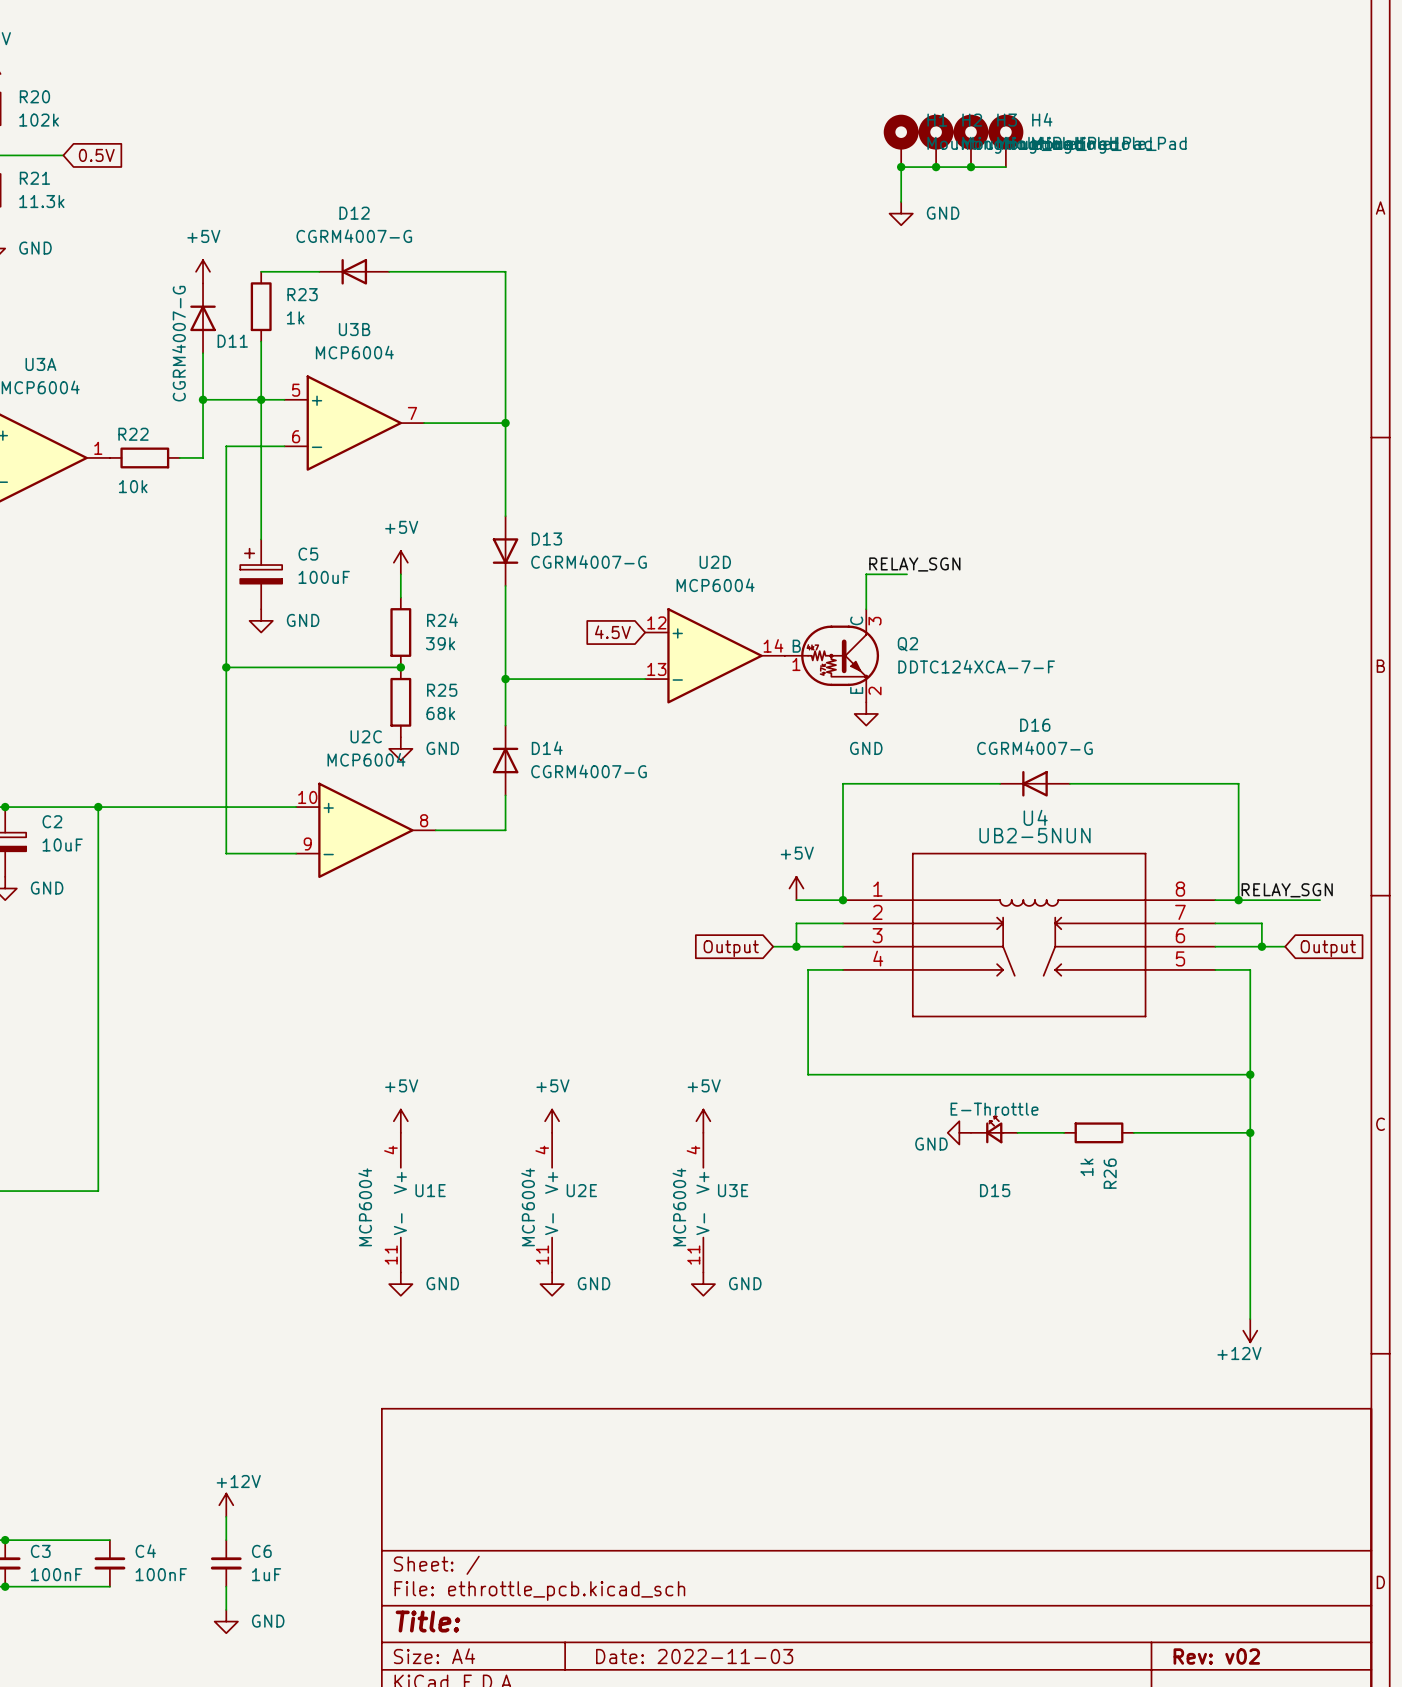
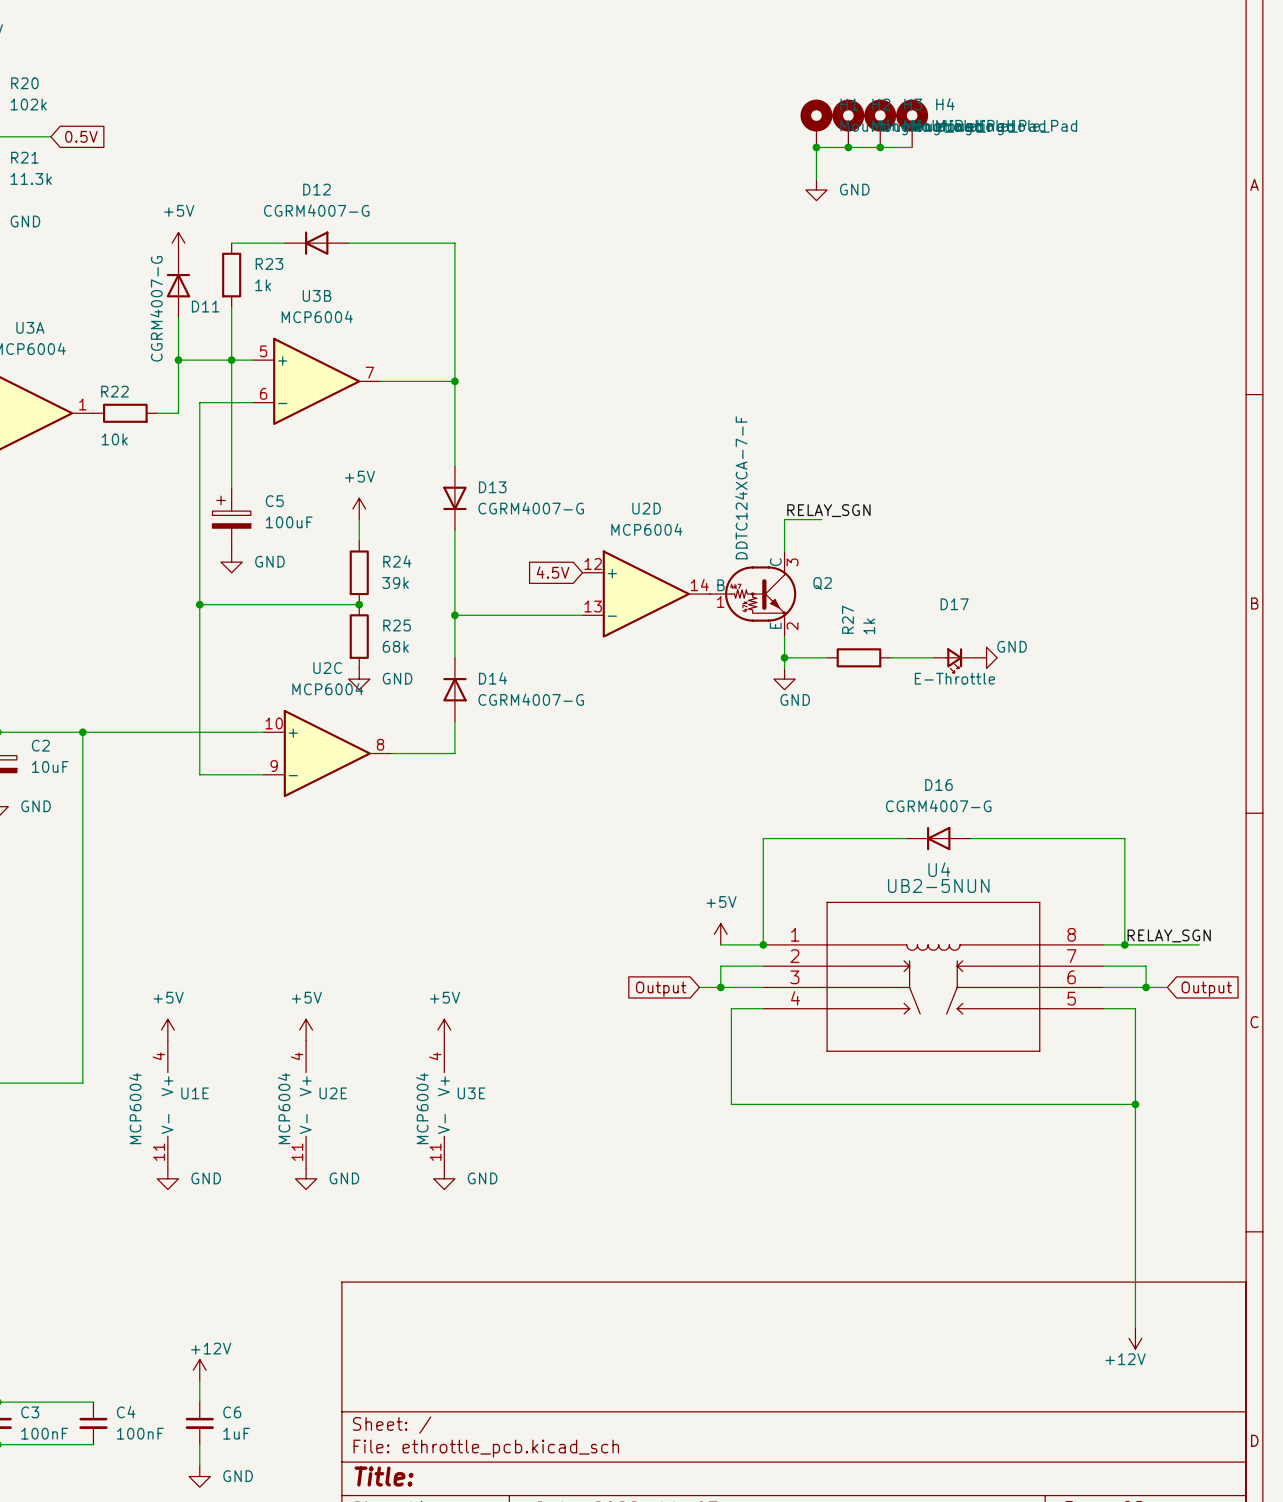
Q2 value rotation: 0° (976, 666) -> 90° counterclockwise (741, 487)
Q2 value position: DDTC124XCA-7-F (976, 666) -> DDTC124XCA-7-F (741, 487)
wire: none -> (784, 636) (784, 668)
power symbol position: GND (866, 713) -> GND (784, 679)
wire: none -> (784, 657) (827, 657)
junction: none -> (784, 657)
R27: none -> 1k (858, 657)
wire: none -> (890, 657) (933, 657)
power symbol: none -> GND (986, 657)
D17: none -> E-Throttle (954, 660)
power symbol text position: GND (866, 748) -> GND (795, 699)
wire: (1000, 783) (843, 783) (843, 900) (796, 900) -> (906, 838) (763, 838) (763, 944) (720, 944)
D16 position: (1035, 783) -> (938, 838)
wire: (1069, 783) (1238, 783) (1238, 900) -> none
power symbol: +5V (796, 888) -> none
label position: RELAY_SGN (1287, 890) -> RELAY_SGN (1169, 935)
junction: (843, 900) -> none
wire: (1215, 900) (1320, 900) -> (1103, 944) (1199, 944)
junction: (1238, 900) -> none
wire: (843, 923) (796, 923) (796, 946) -> (763, 966) (720, 966) (720, 987)
wire: (1238, 923) (1261, 923) (1261, 946) -> (1124, 838) (1124, 944)
U4 position: (1029, 935) -> (933, 976)
wire: (773, 946) (843, 946) -> (699, 987) (763, 987)
junction: (796, 946) -> none
wire: (1215, 946) (1285, 946) -> (1103, 987) (1167, 987)
junction: (1261, 946) -> none
global label position: Output (731, 948) -> Output (661, 989)
global label position: Output (1328, 948) -> Output (1206, 989)
wire: (843, 969) (808, 969) (808, 1074) (1250, 1074) -> (763, 1008) (731, 1008) (731, 1104) (1135, 1104)
wire: (1215, 969) (1250, 969) (1250, 1109) -> (1103, 1008) (1135, 1008)
power symbol: none -> +5V (720, 934)
junction: none -> (763, 944)
junction: none -> (1124, 944)
wire: none -> (1103, 966) (1146, 966) (1146, 987)
junction position: (1250, 1074) -> (1146, 987)
junction: none -> (720, 987)
power symbol: +5V (400, 1121) -> none
power symbol: +5V (552, 1121) -> none
power symbol: +5V (703, 1121) -> none
D15: E-Throttle (994, 1129) -> none
power symbol: none -> +5V (167, 1029)
power symbol: none -> +5V (306, 1029)
power symbol: none -> +5V (444, 1029)
power symbol: GND (959, 1132) -> none
wire: (1017, 1132) (1064, 1132) -> none
R26: 1k (1099, 1132) -> none
wire: (1133, 1132) (1250, 1132) -> none
junction: (1250, 1132) -> none
U1E position: (400, 1202) -> (167, 1104)
U2E position: (552, 1202) -> (306, 1104)
U3E position: (703, 1202) -> (444, 1104)
junction: none -> (1135, 1104)
power symbol: GND (400, 1284) -> none
power symbol: GND (552, 1284) -> none
power symbol: GND (703, 1284) -> none
power symbol: none -> GND (167, 1178)
power symbol: none -> GND (306, 1178)
power symbol: none -> GND (444, 1178)
wire: none -> (1135, 1200) (1135, 1327)
power symbol position: +12V (1250, 1330) -> +12V (1135, 1338)

